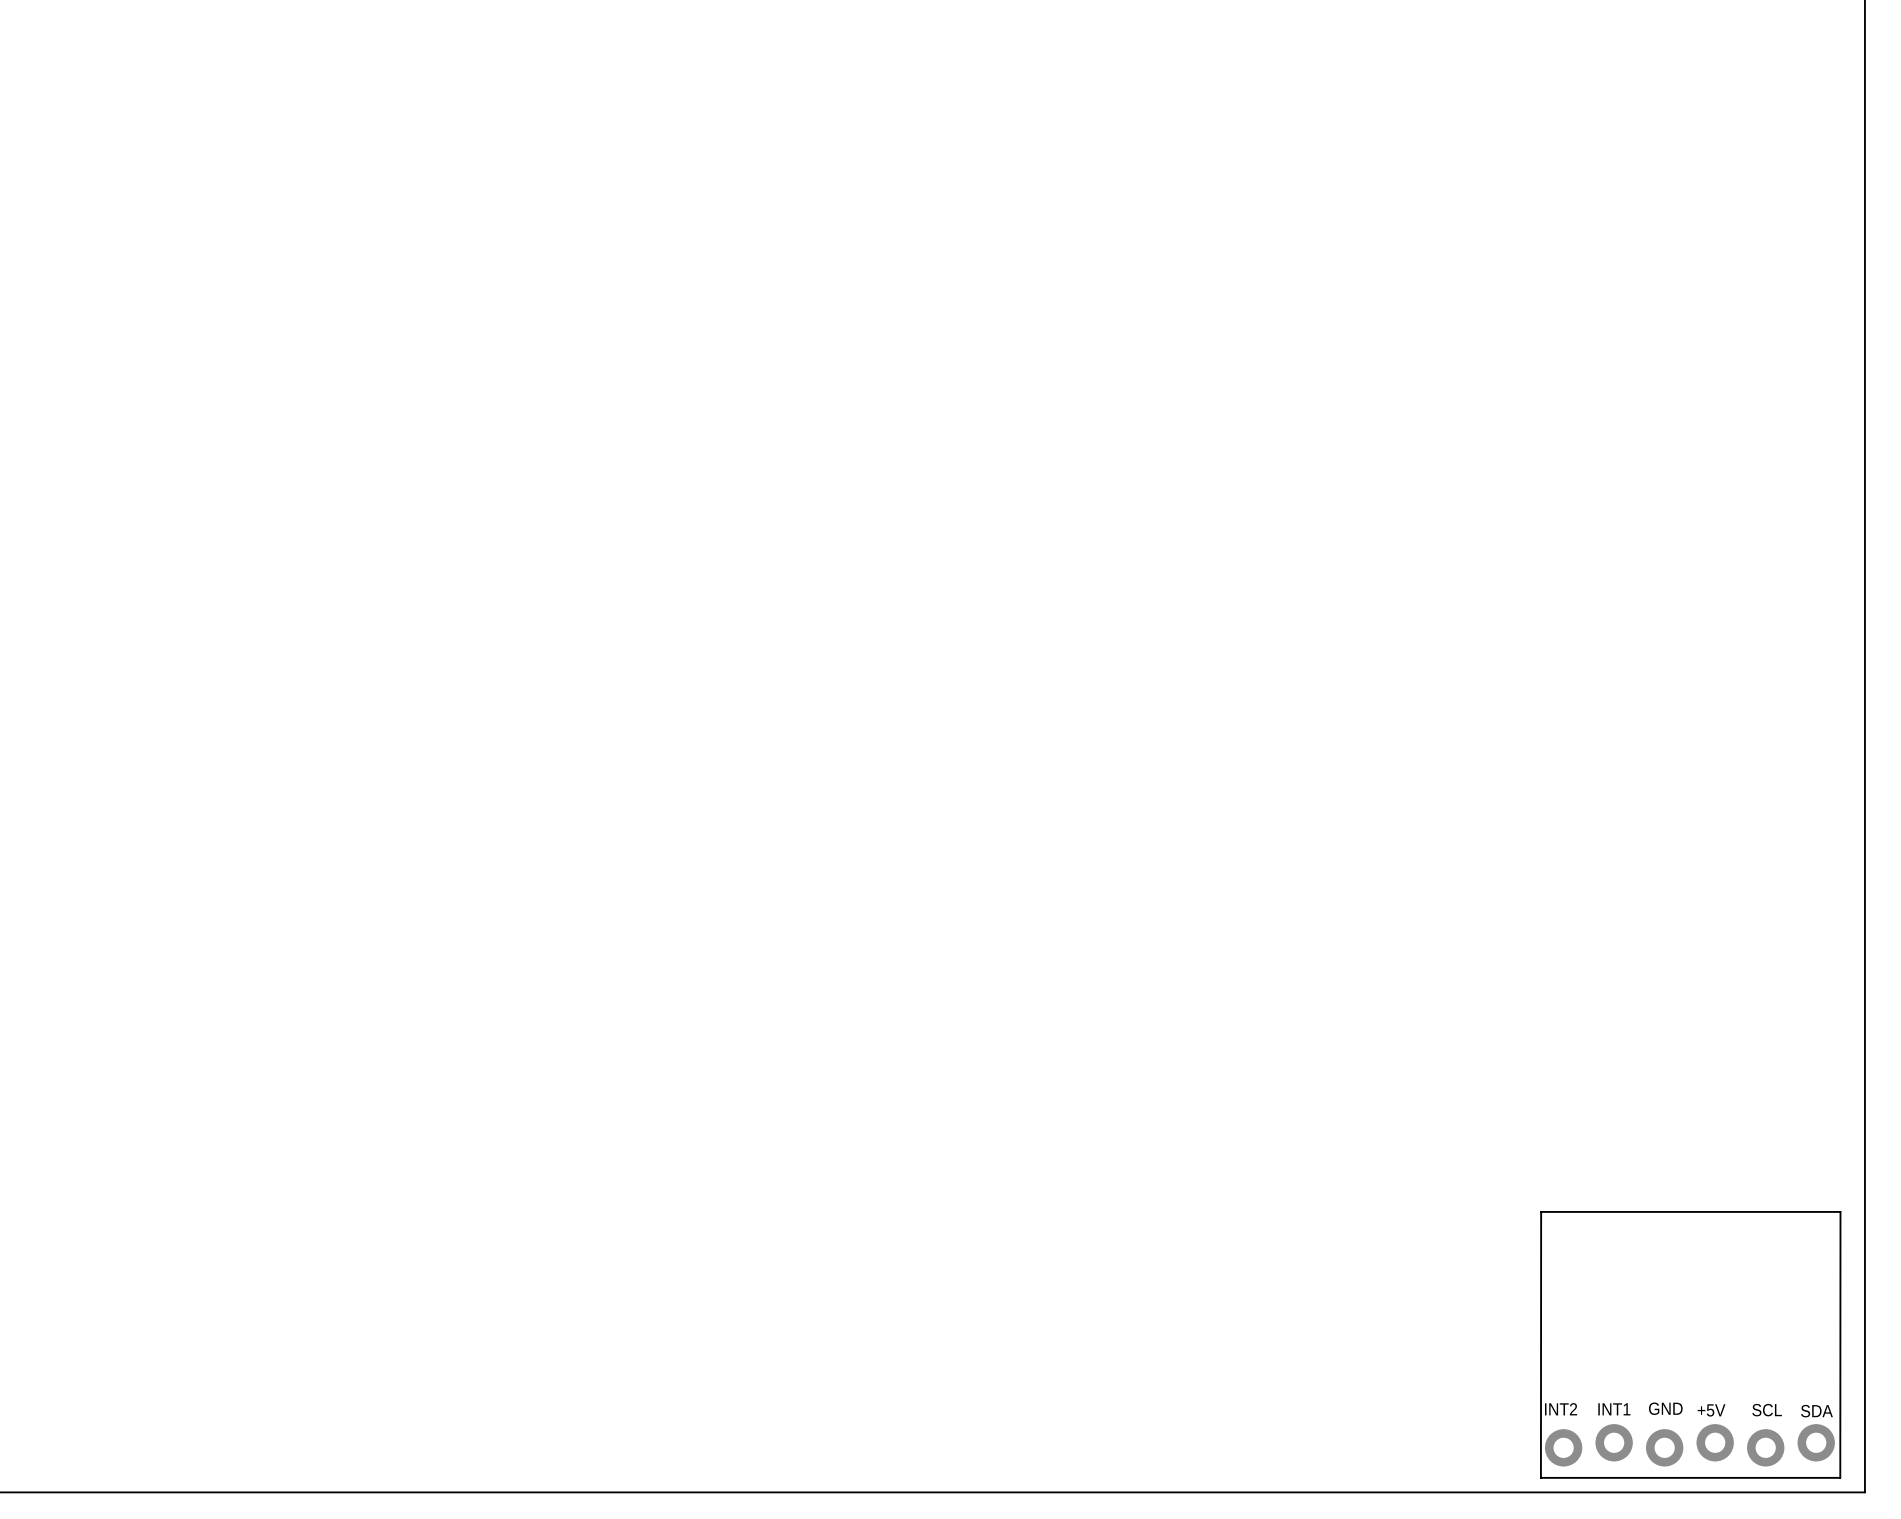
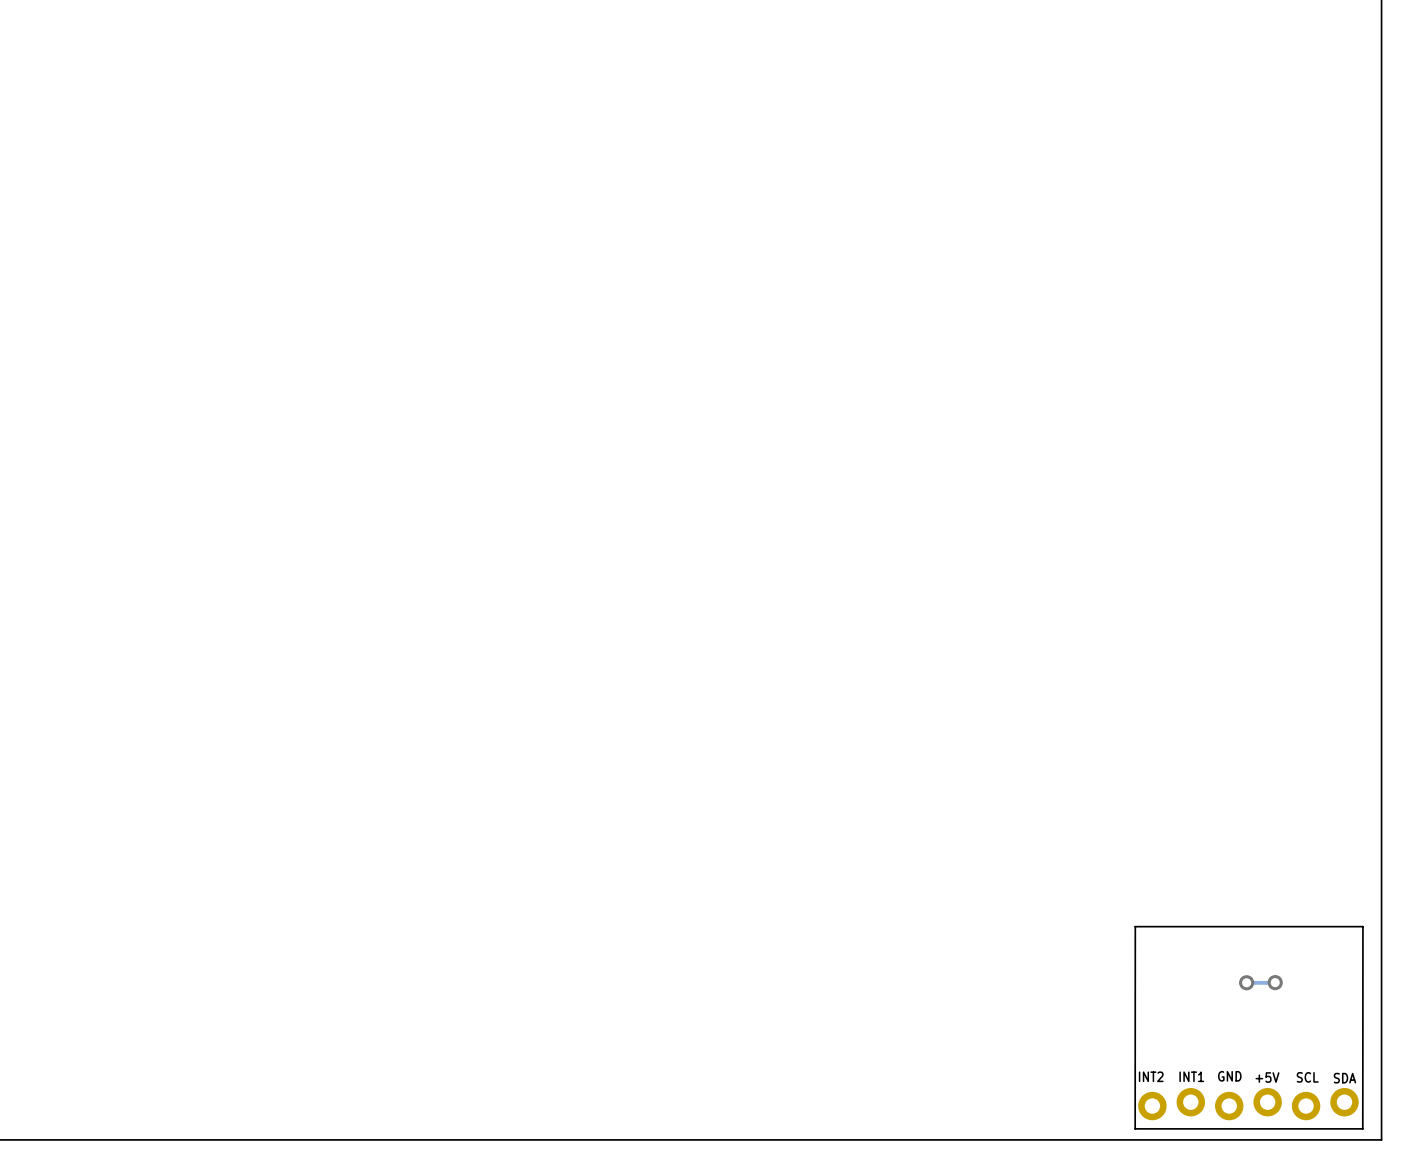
track: none -> (1246, 982) (1275, 982) (1275, 984)
via: none -> (1246, 982)
via: none -> (1275, 982)

